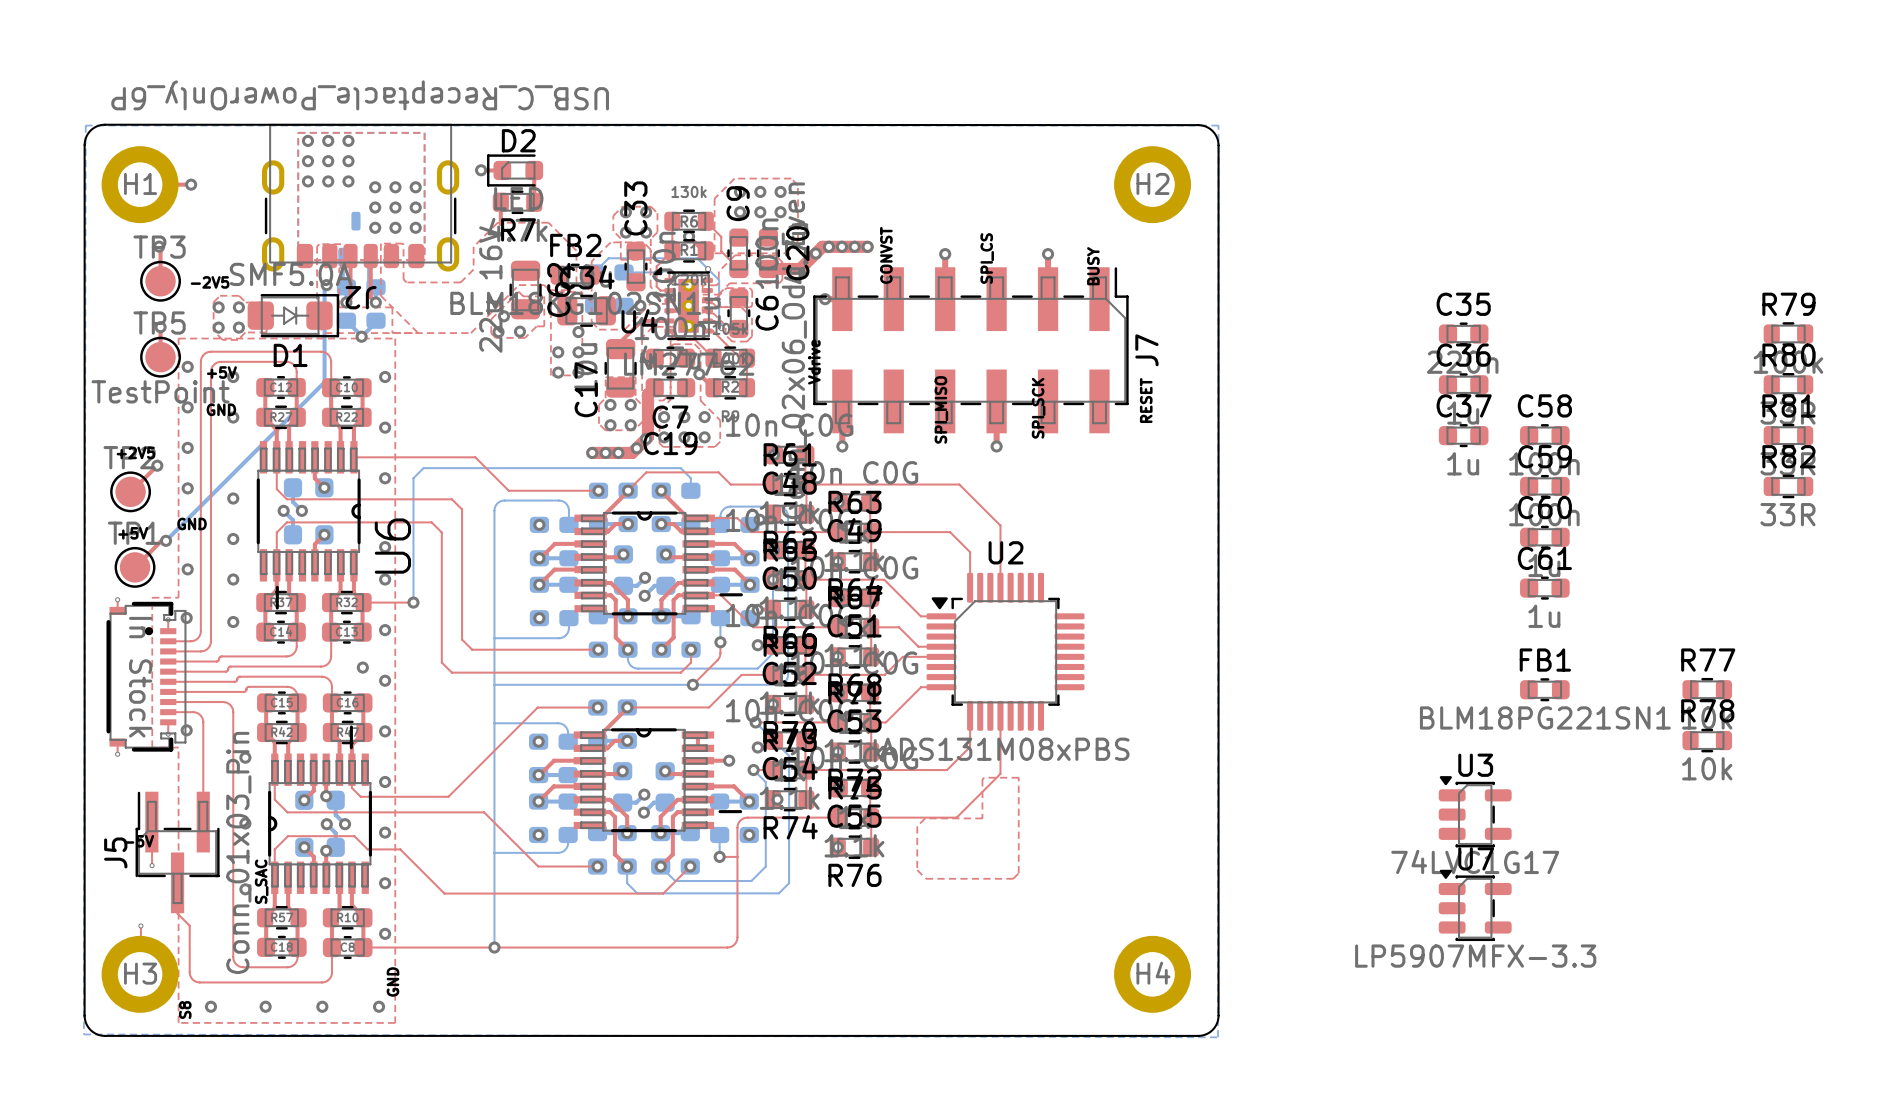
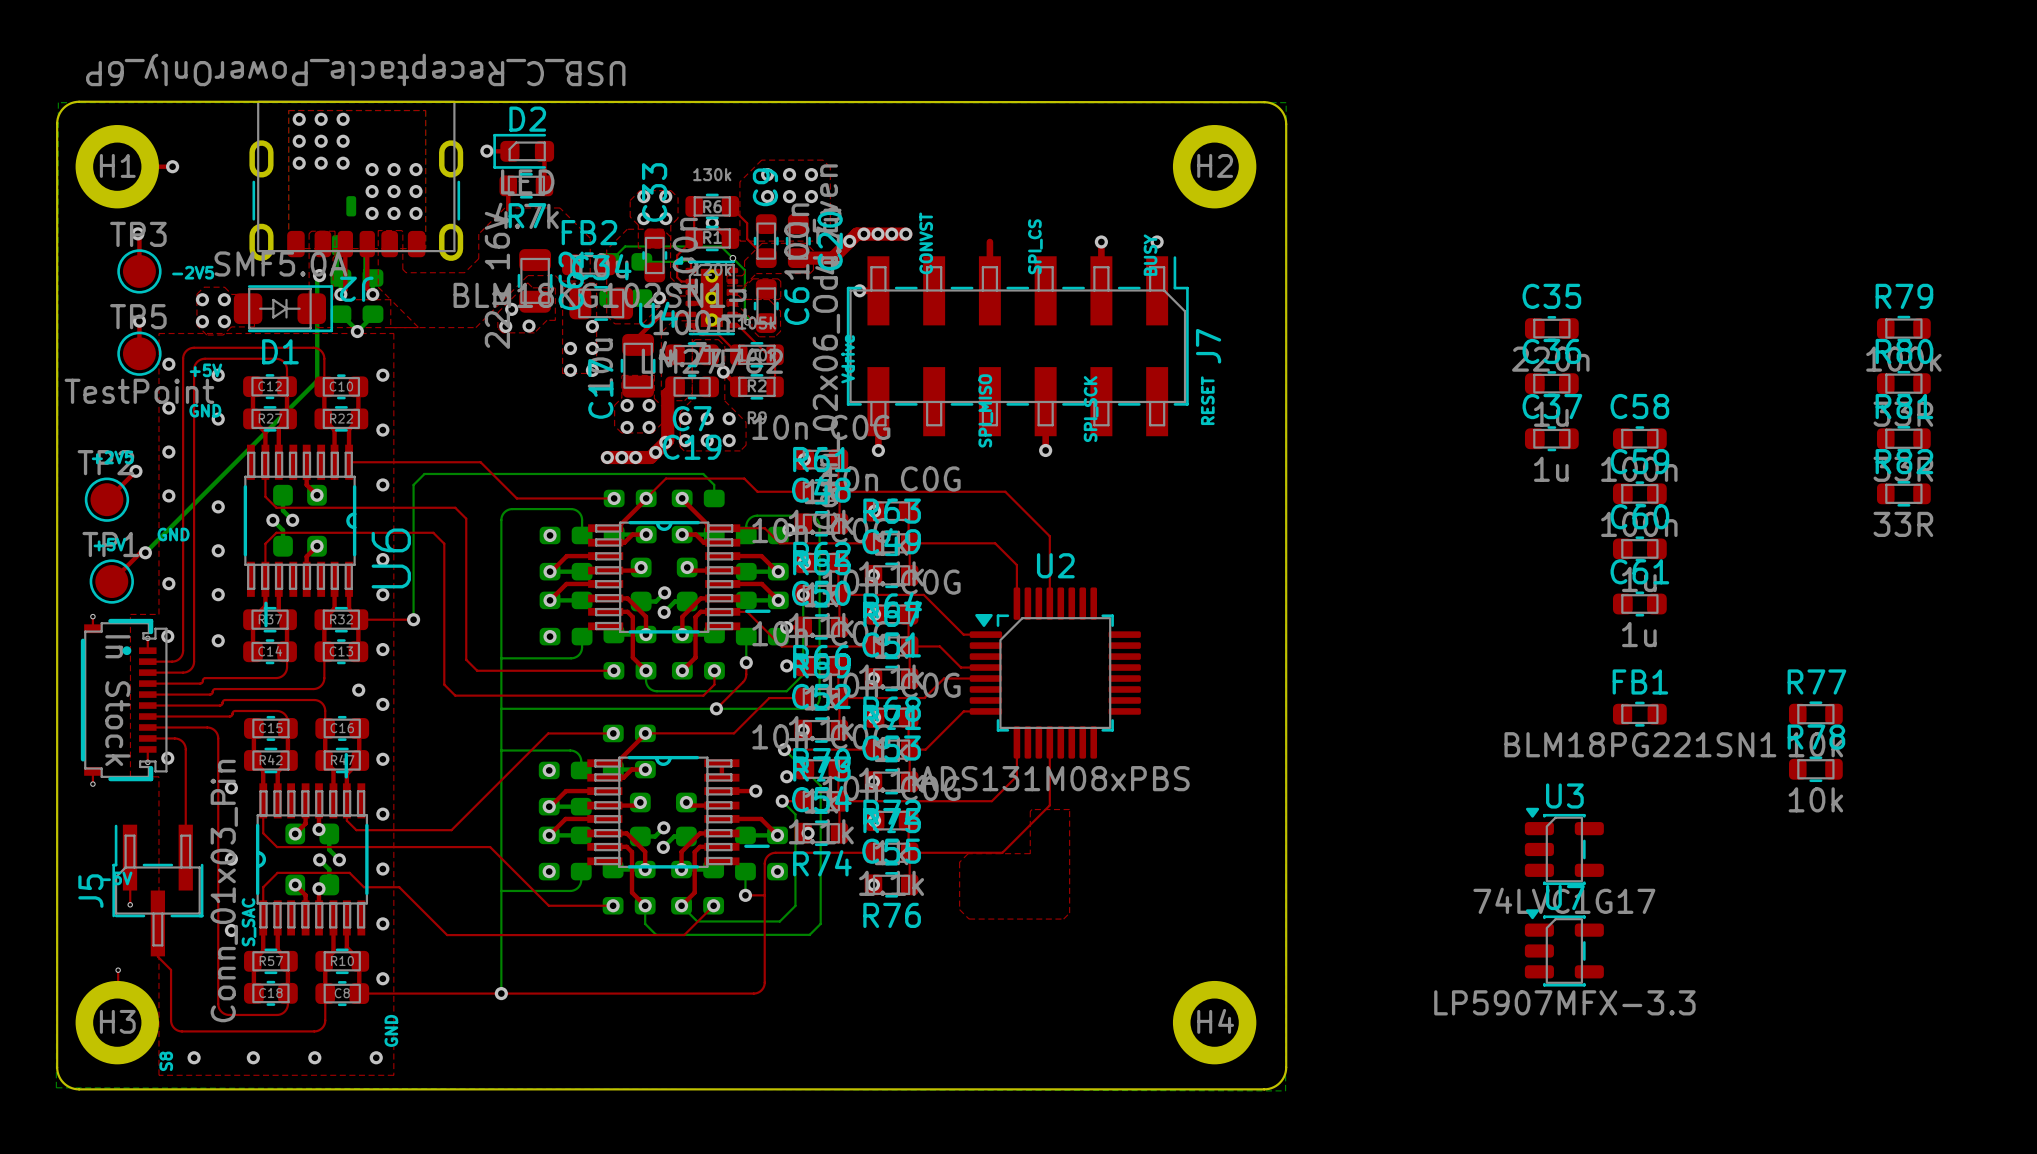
via: (945, 254) -> none
via: none -> (1157, 241)

